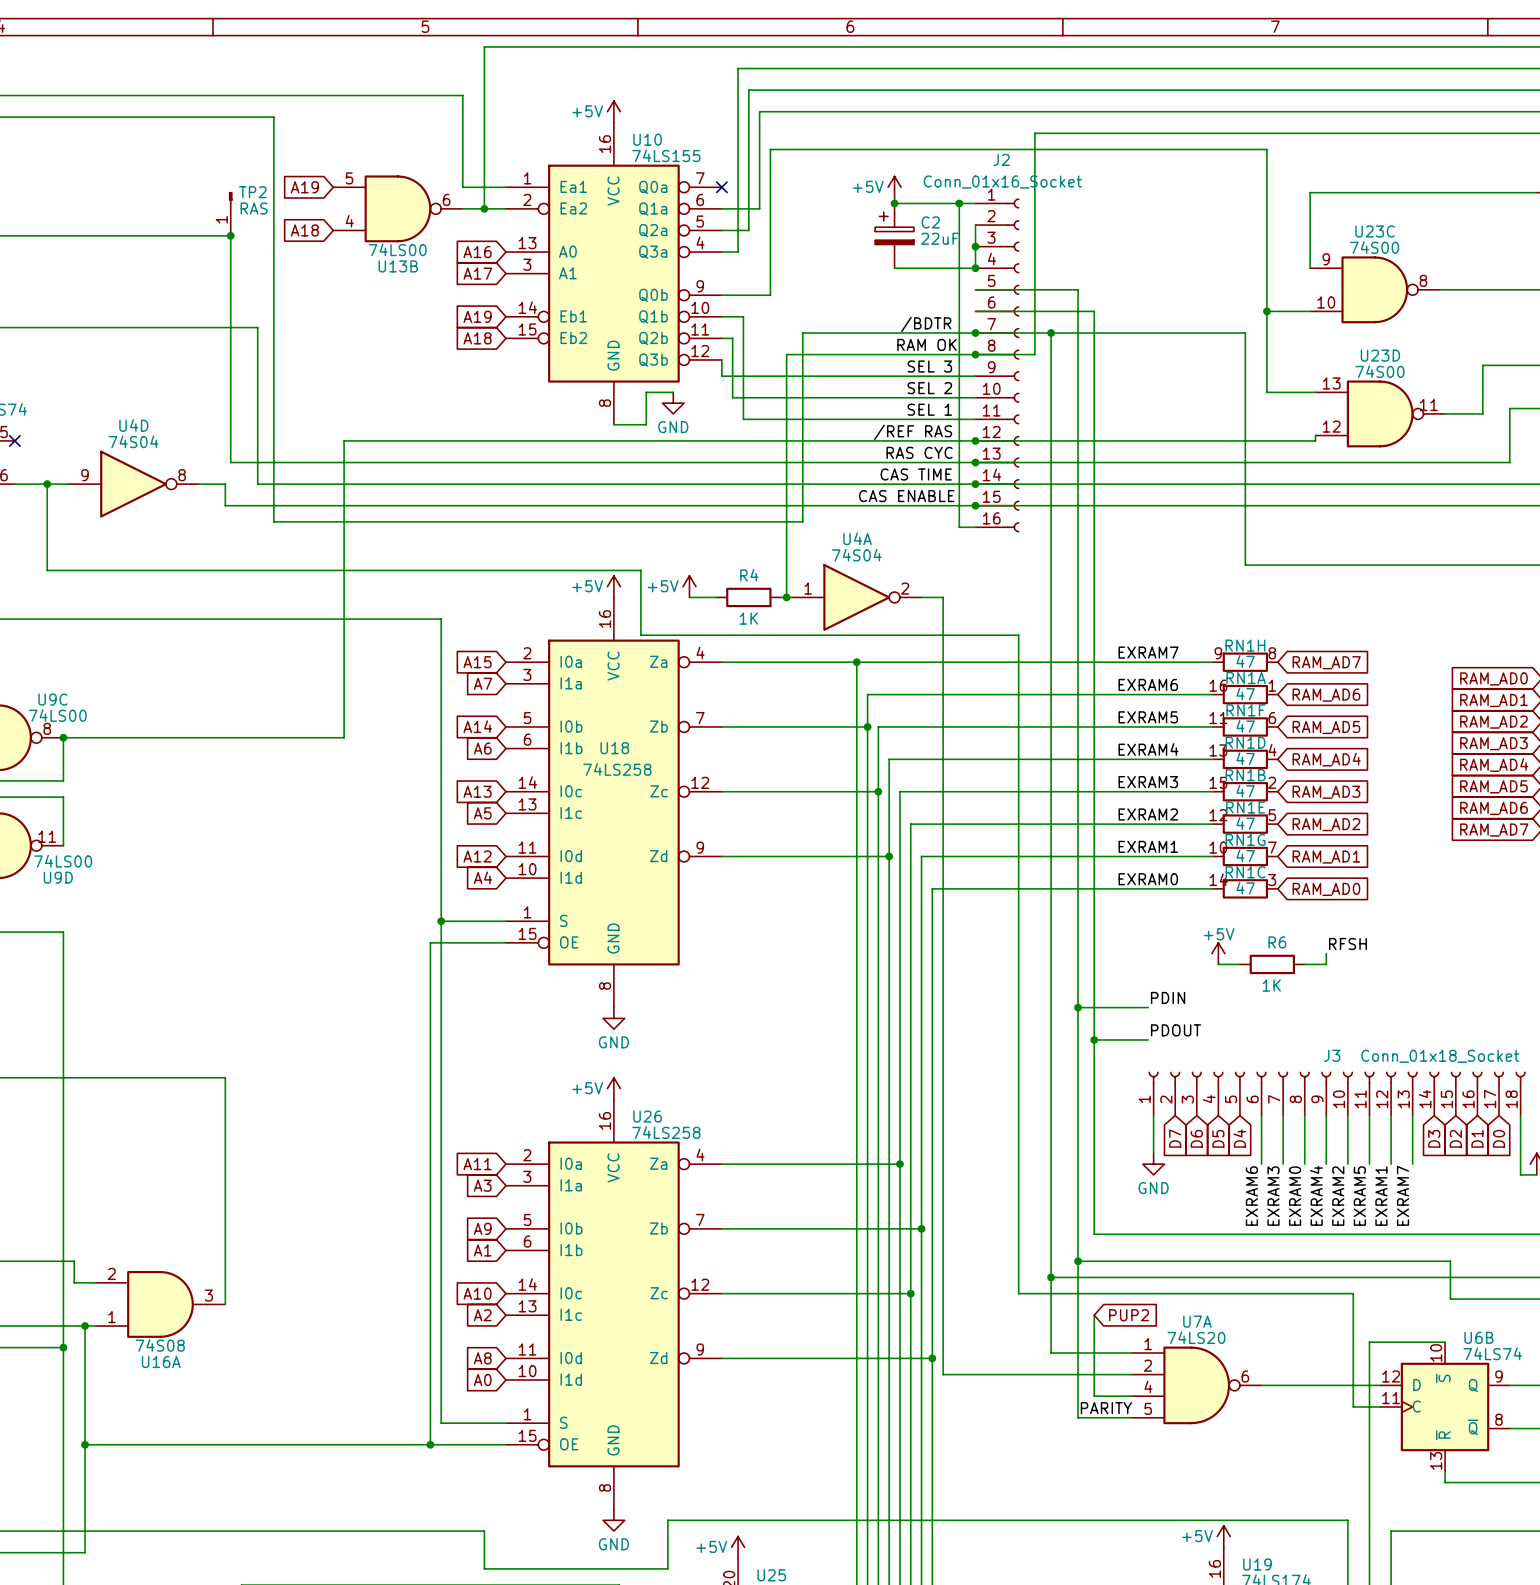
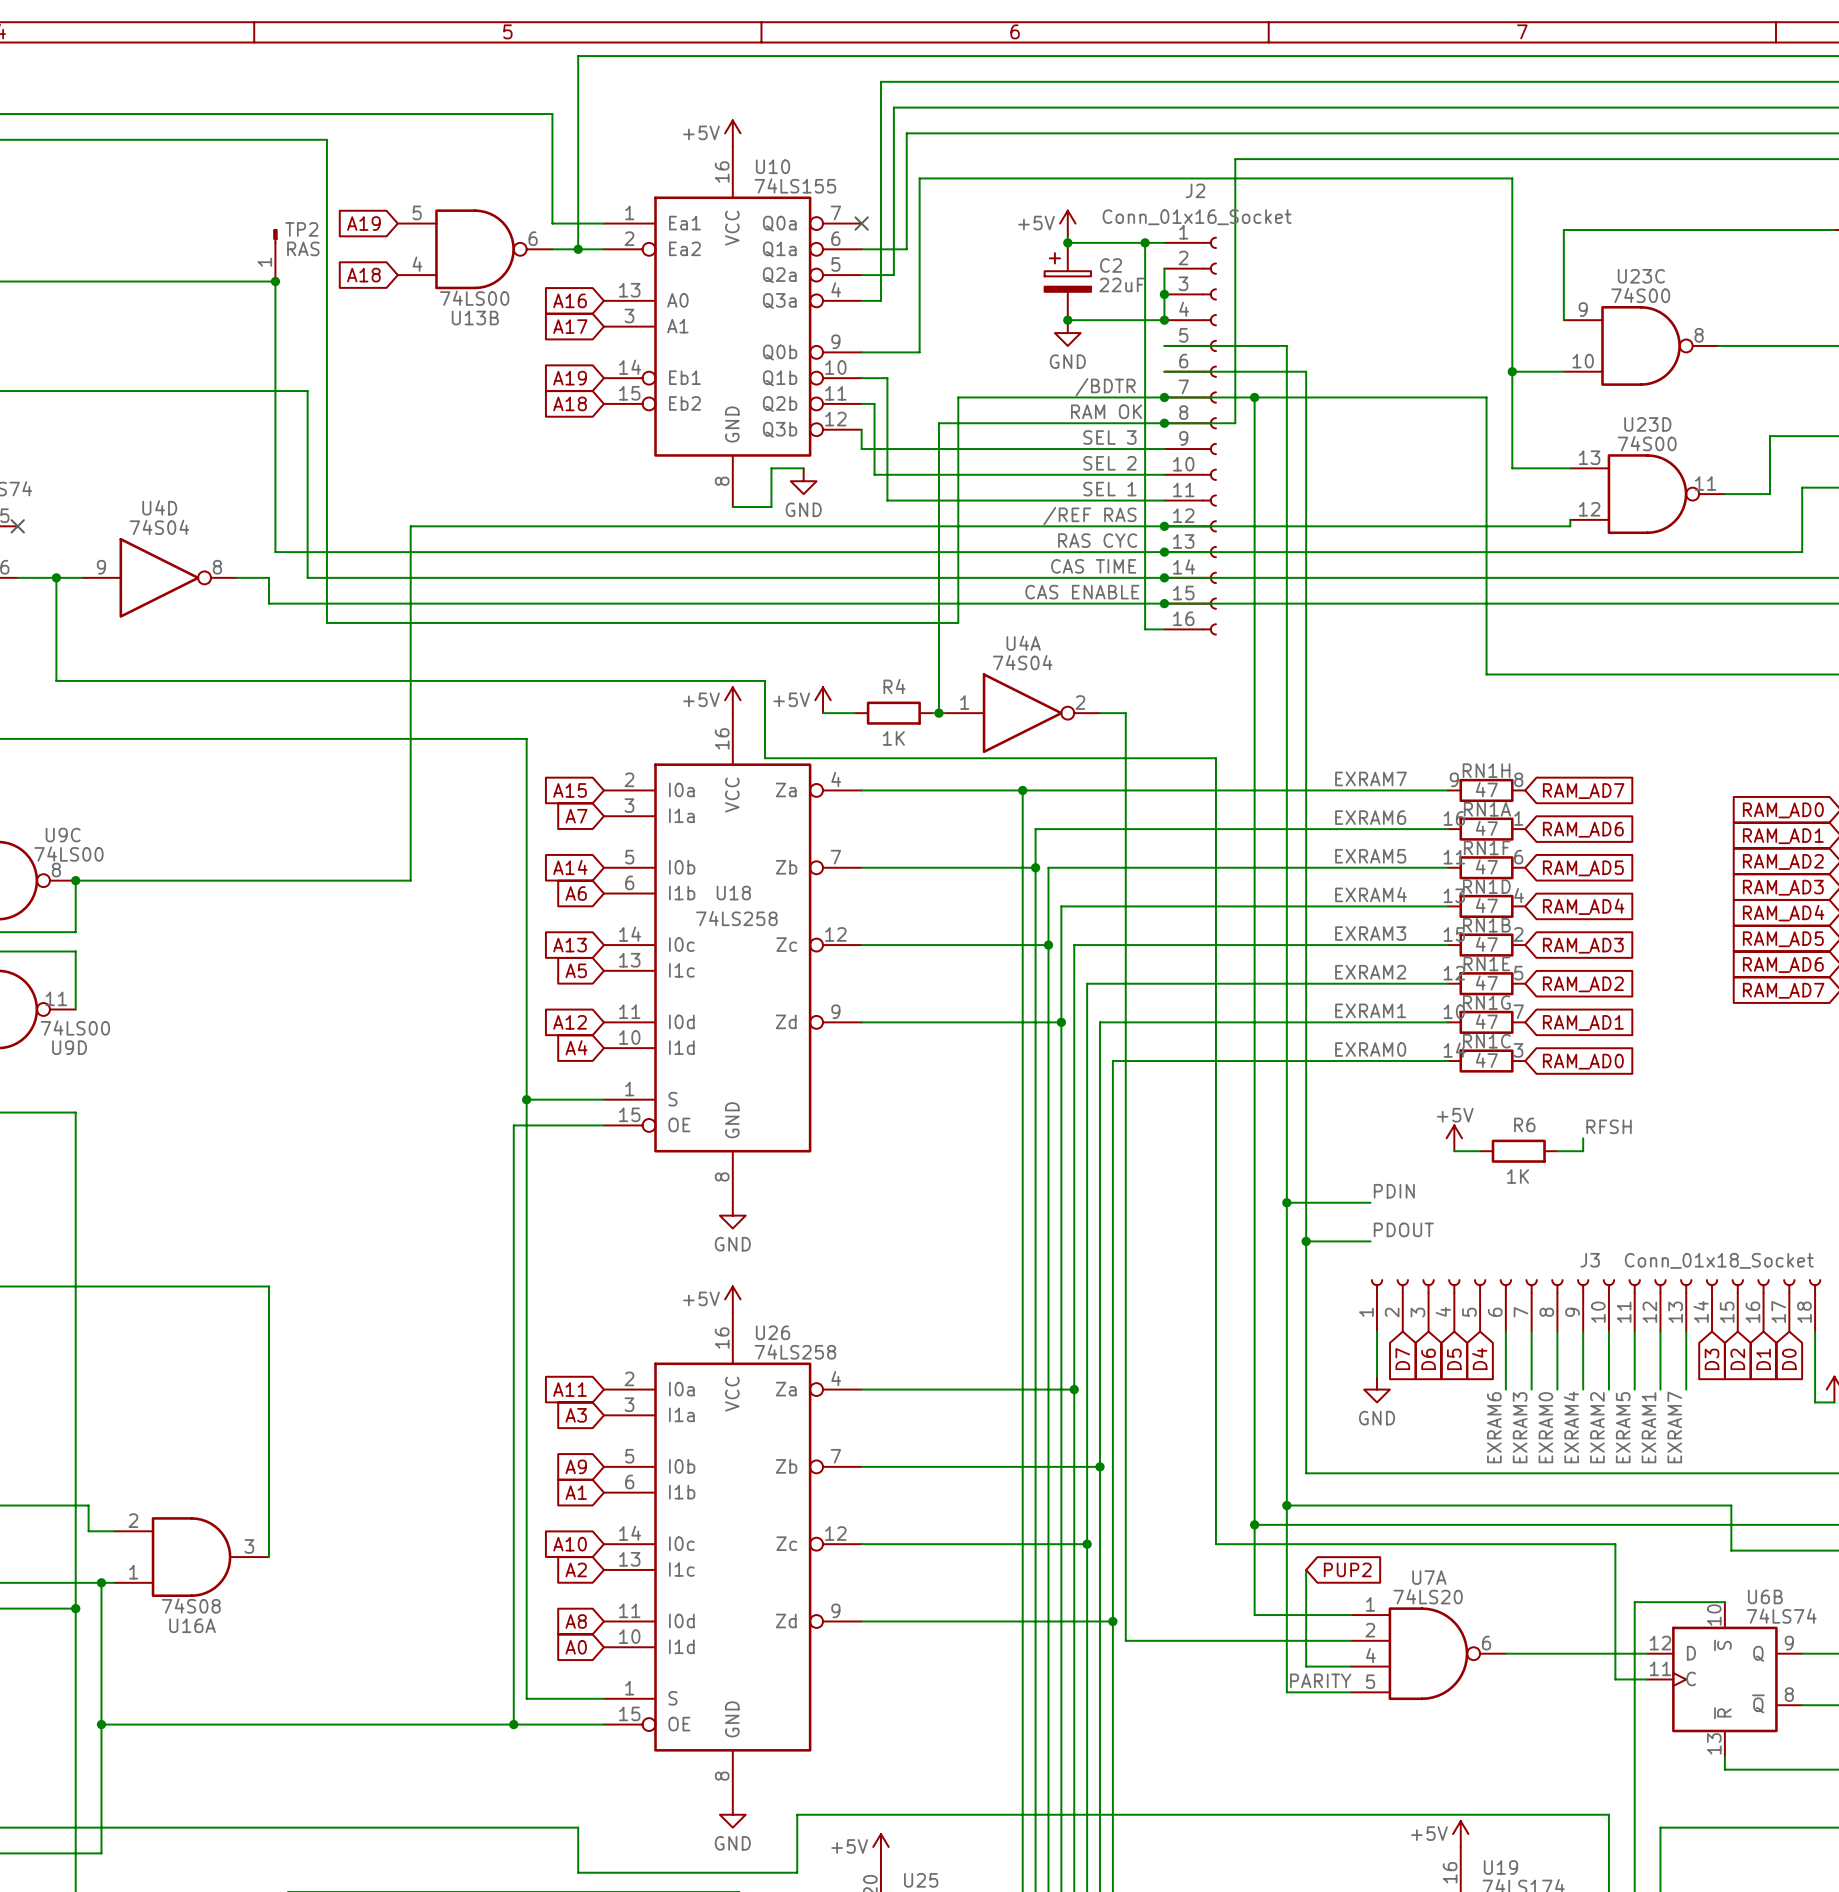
junction: none -> (1067, 320)
power symbol: none -> GND (1067, 333)

